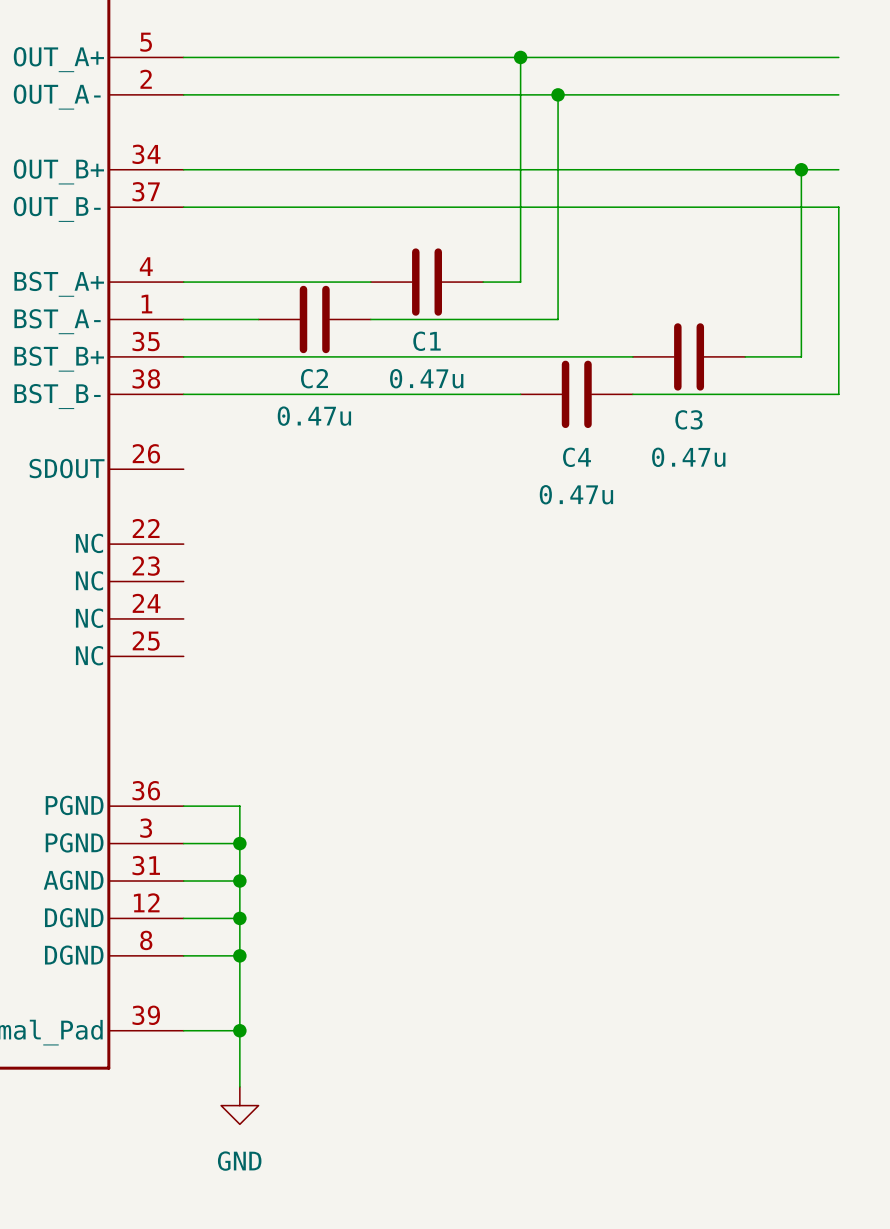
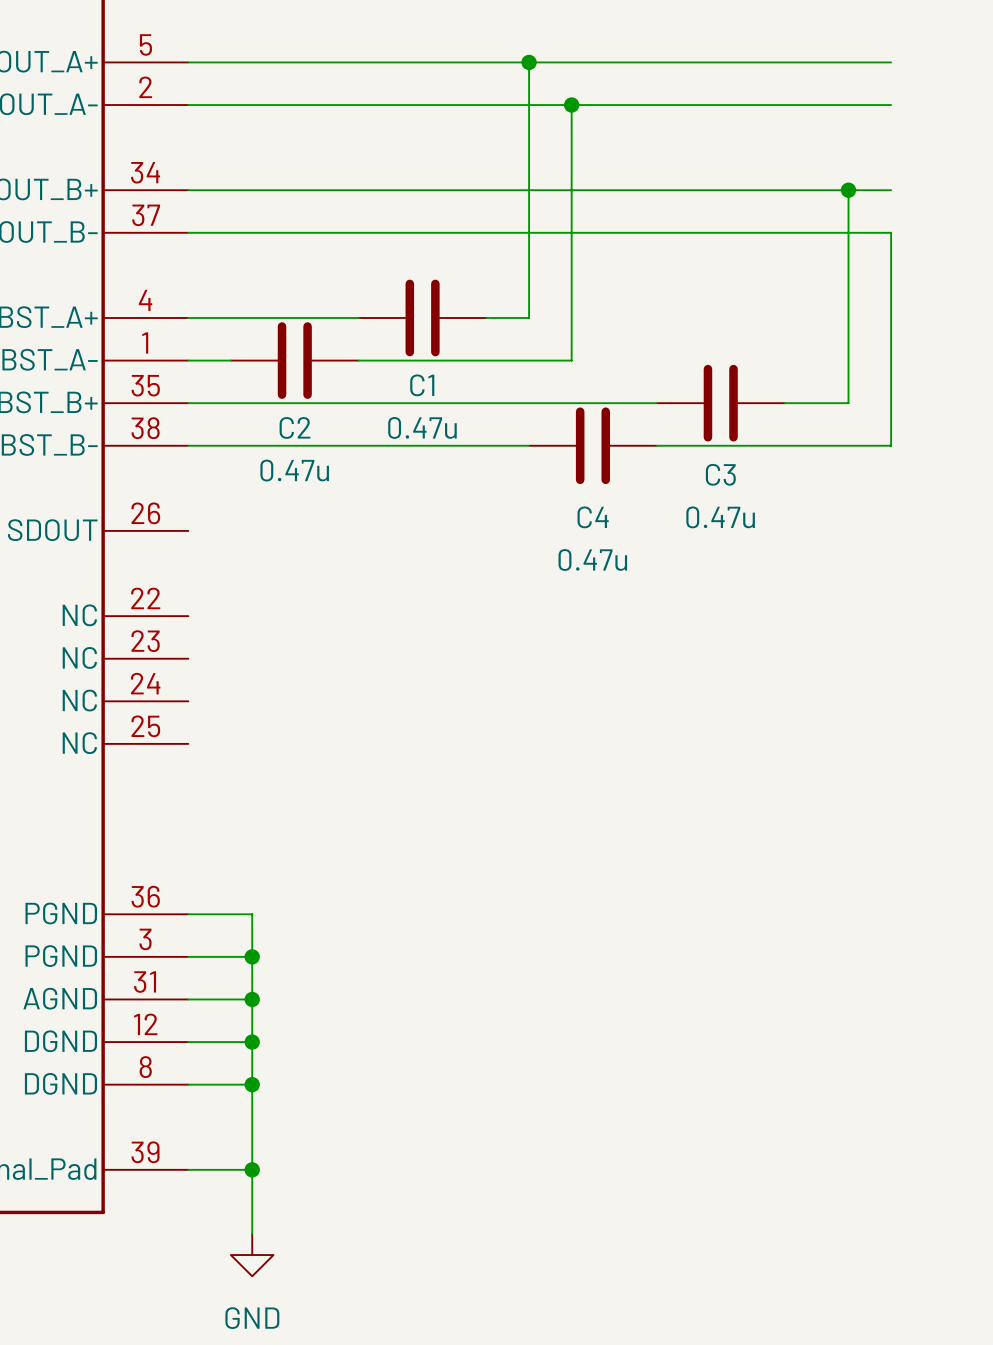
junction: none -> (529, 62)
wire: (520, 57) (520, 94) -> none
junction: (520, 57) -> none
wire: (801, 57) (838, 57) -> none
junction: none -> (571, 105)
wire: (558, 94) (558, 319) (520, 319) -> (529, 62) (529, 317) (486, 317)
junction: (558, 94) -> none
wire: (801, 94) (838, 94) -> none
wire: none -> (848, 190) (848, 403)
junction position: (801, 169) -> (848, 190)
wire: (838, 169) (801, 169) (801, 207) (838, 207) (838, 394) (801, 394) -> none
C1 position: (427, 282) -> (422, 317)
wire: (483, 282) (520, 282) -> (571, 360) (571, 317)
C2 position: (314, 319) -> (294, 360)
C3 position: (689, 356) -> (720, 403)
wire: (763, 356) (801, 356) -> (891, 445) (891, 403)
C4 position: (576, 394) -> (592, 445)

